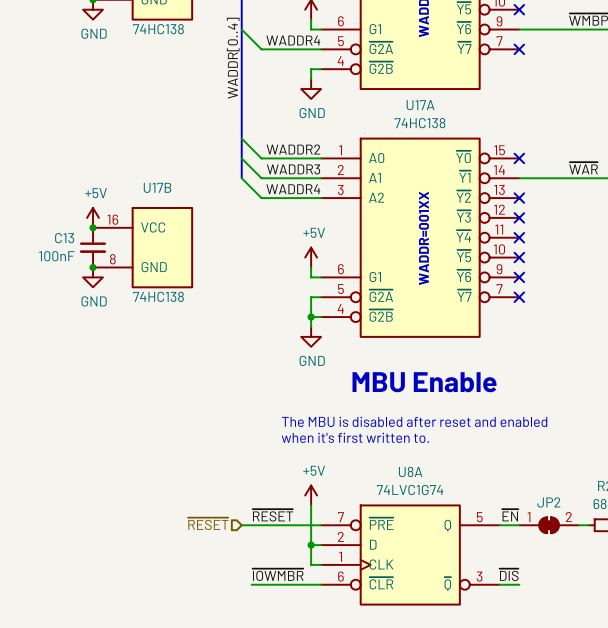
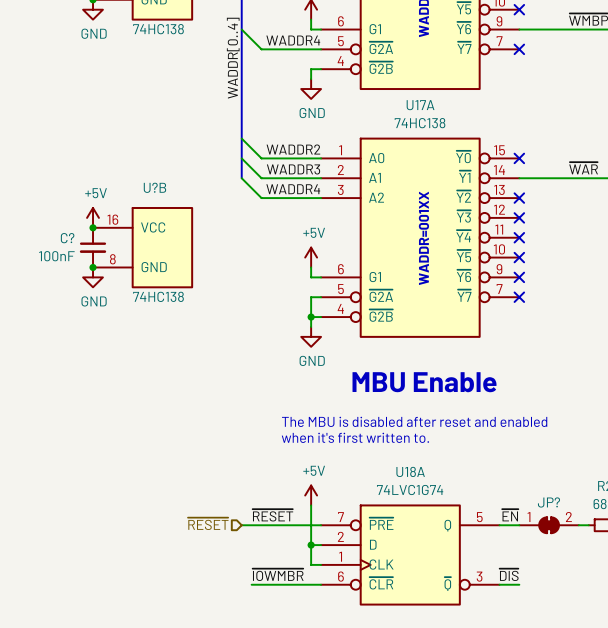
U17B name: U17B (157, 187) -> U?B (154, 187)
C13 name: C13 (64, 238) -> C? (67, 238)
U8A name: U8A (410, 471) -> U18A (410, 471)
JP2 name: JP2 (548, 502) -> JP? (548, 502)

